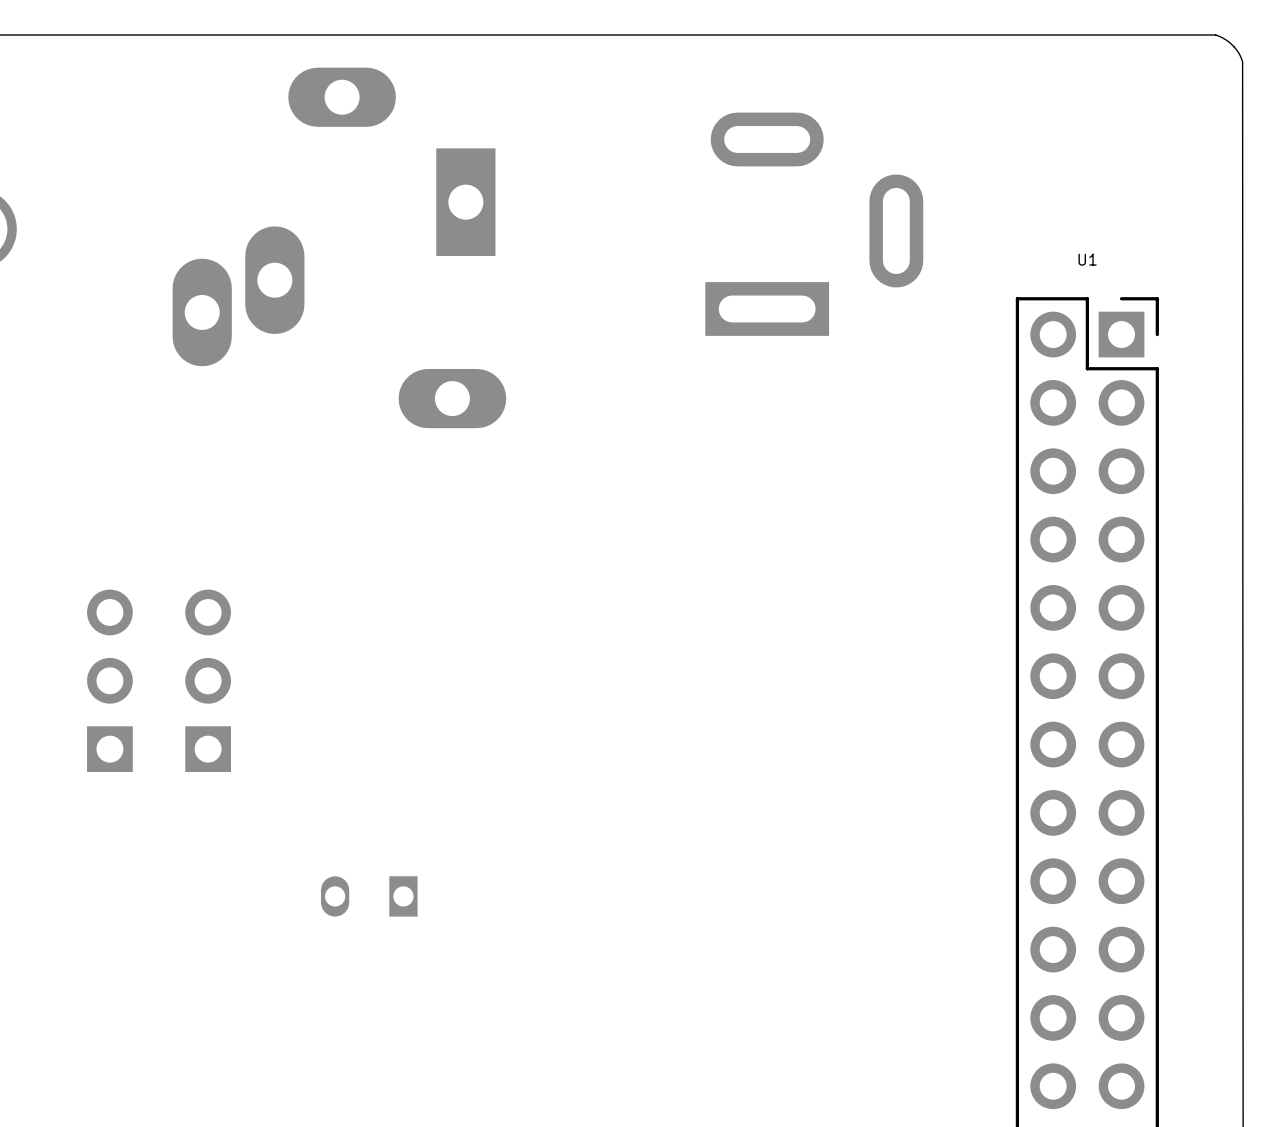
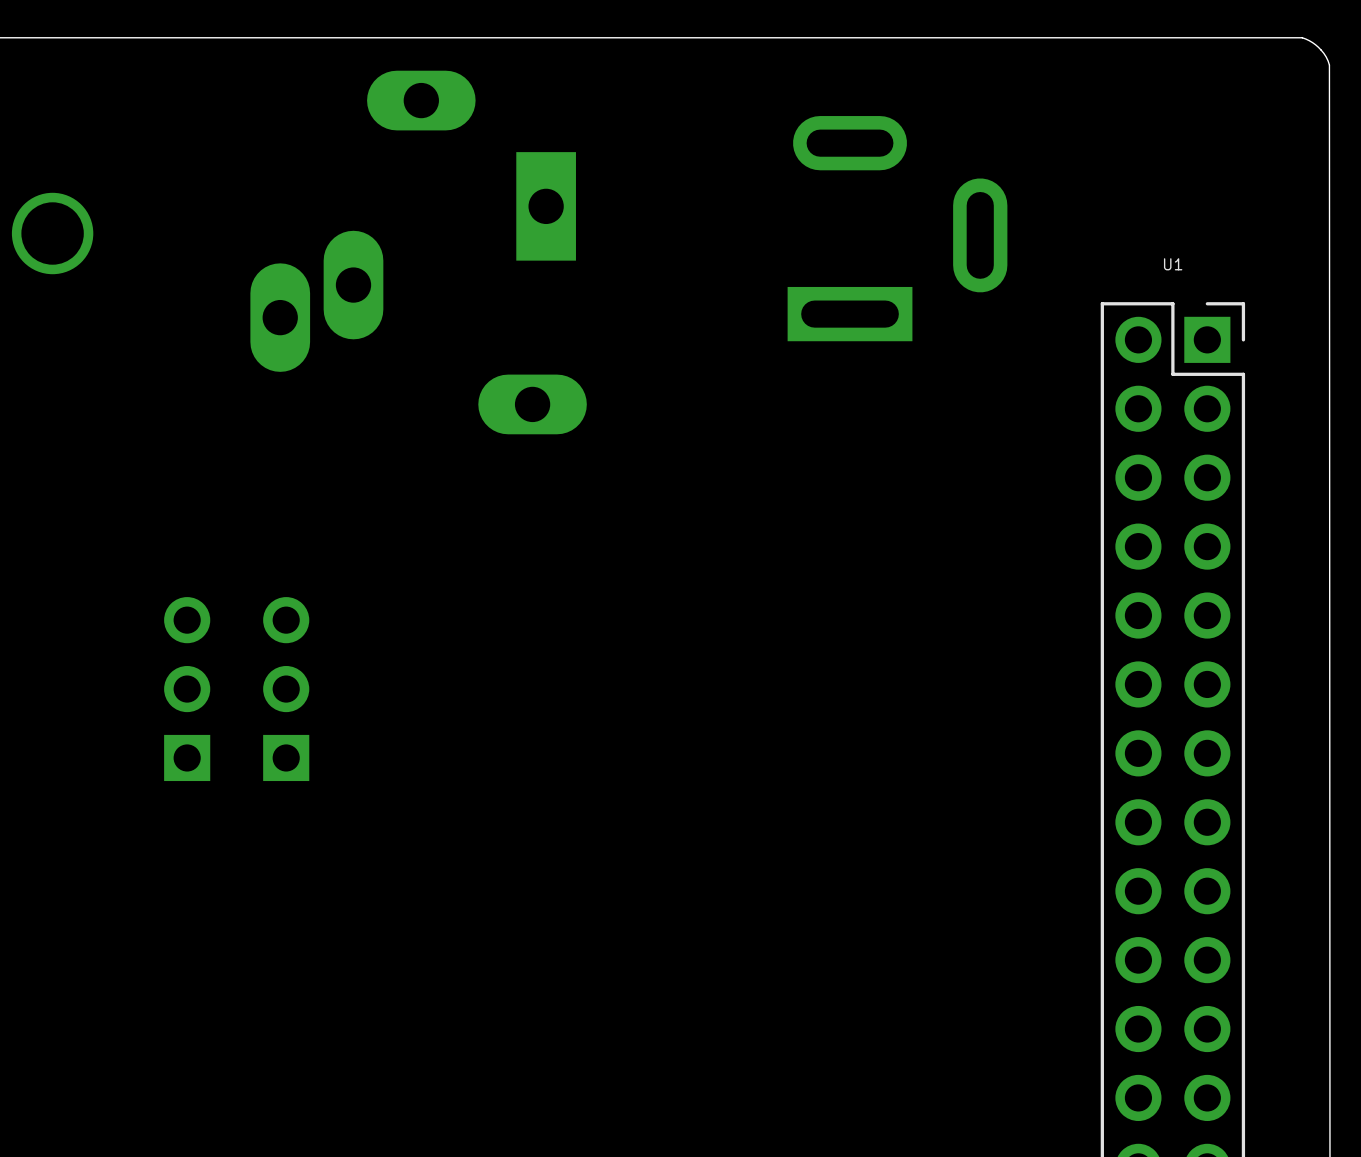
part: (369, 896) -> none

